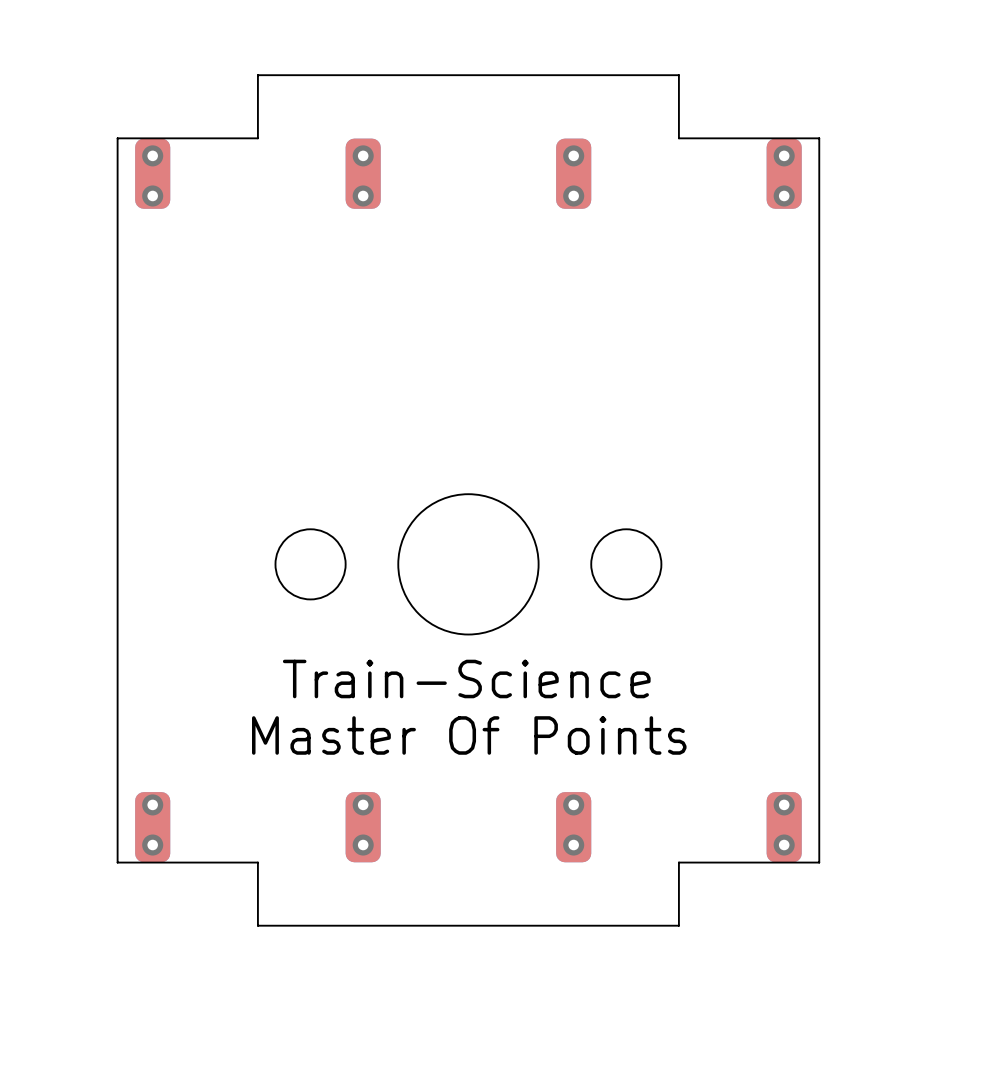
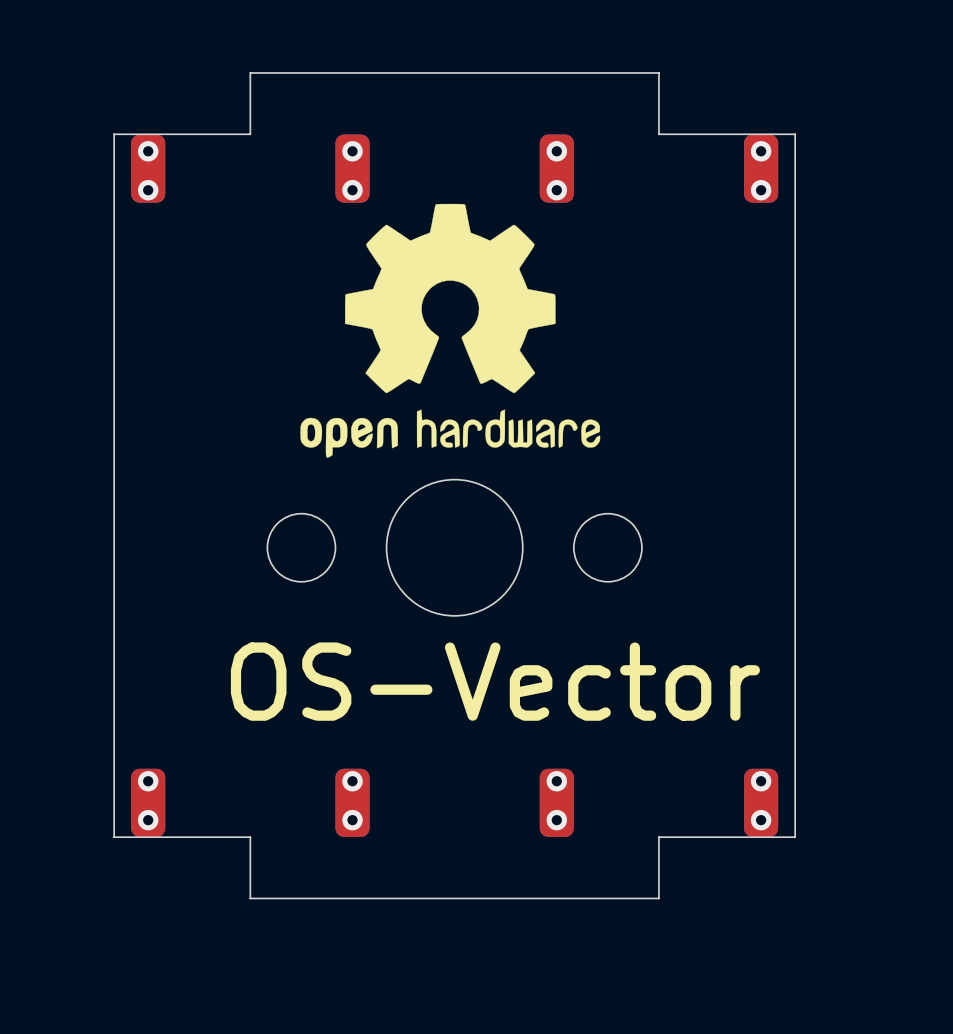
drawing: none -> [300, 203, 601, 458]
text: Train-Science (466, 678) -> none
text: none -> OS-Vector (495, 681)
text: Master Of Points (469, 735) -> none

